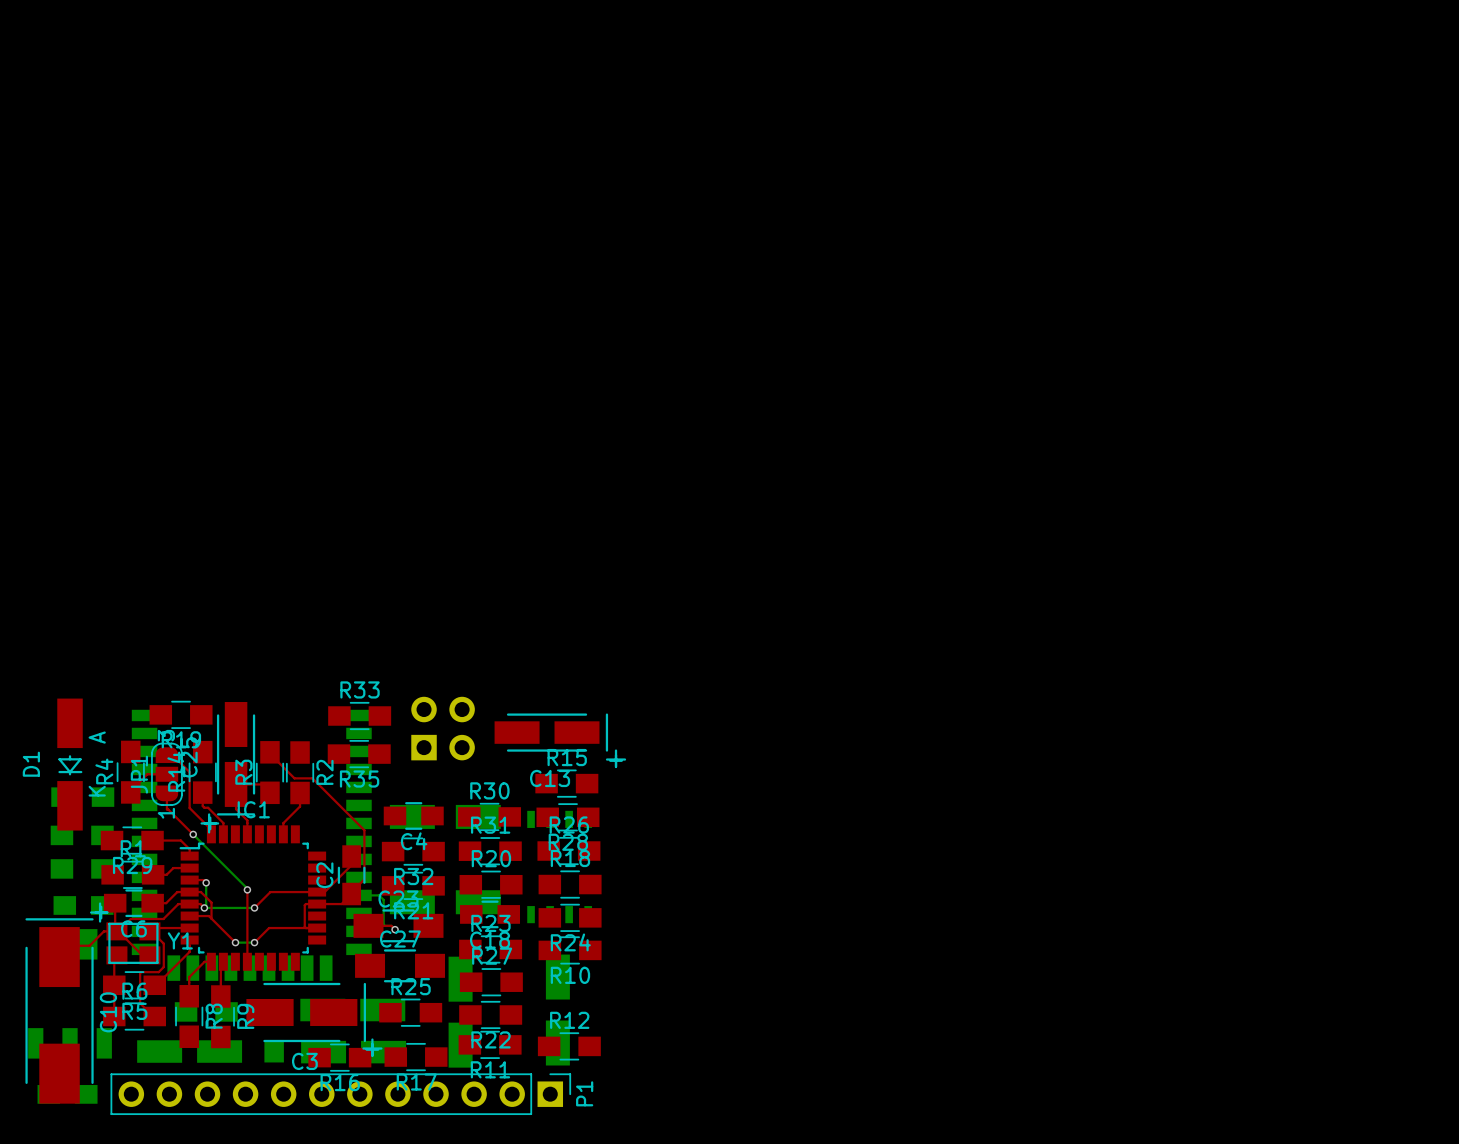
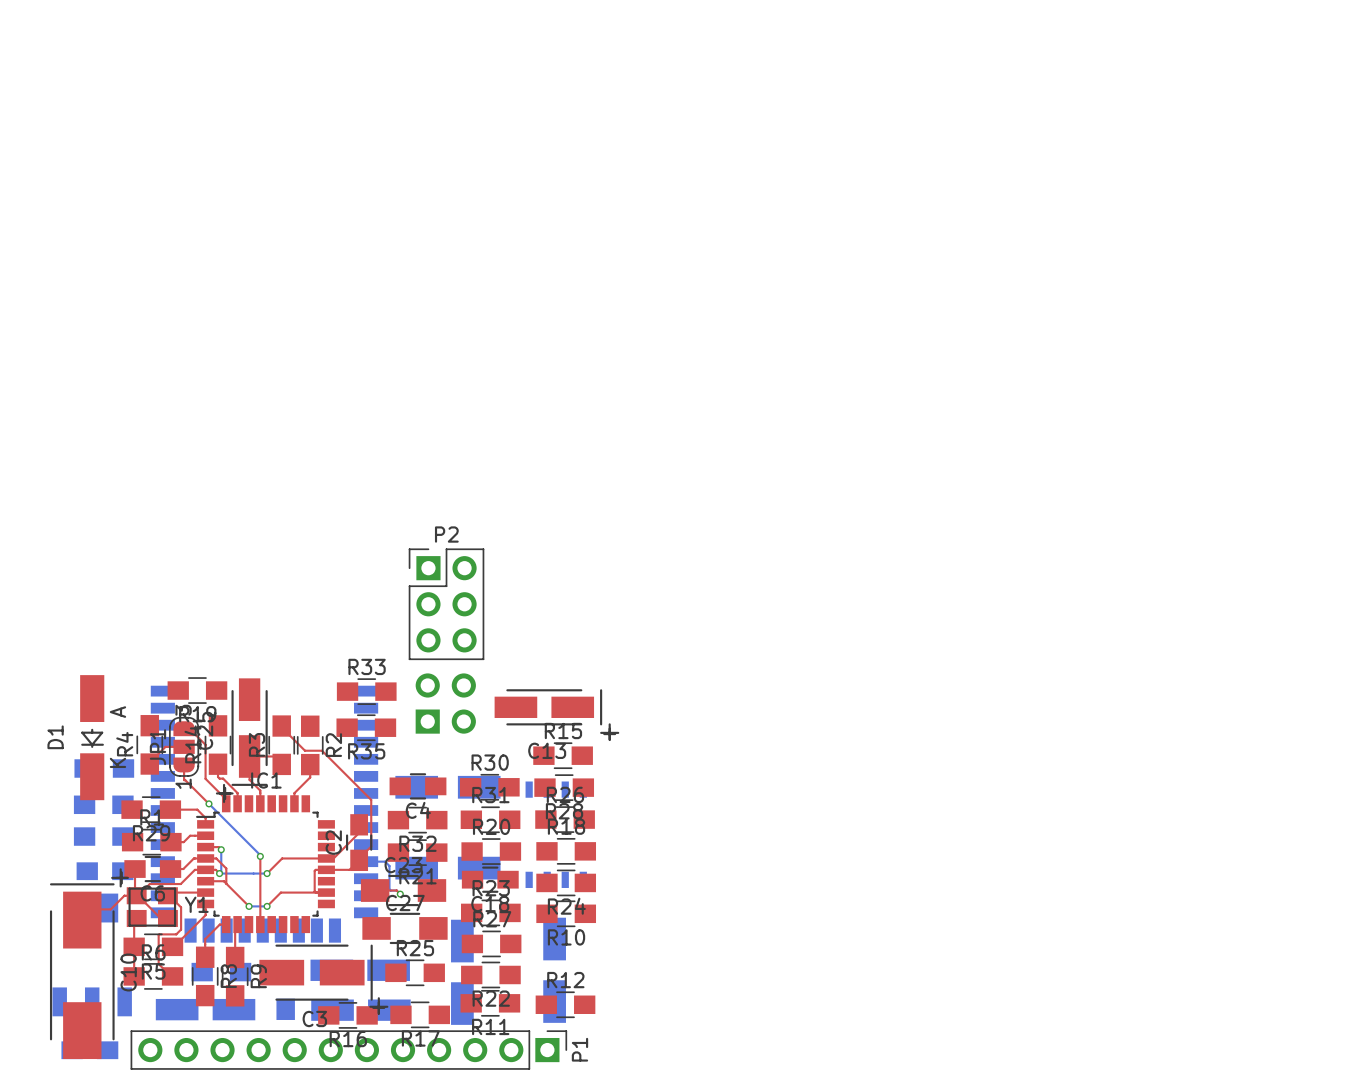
P2: none -> (446, 604)

